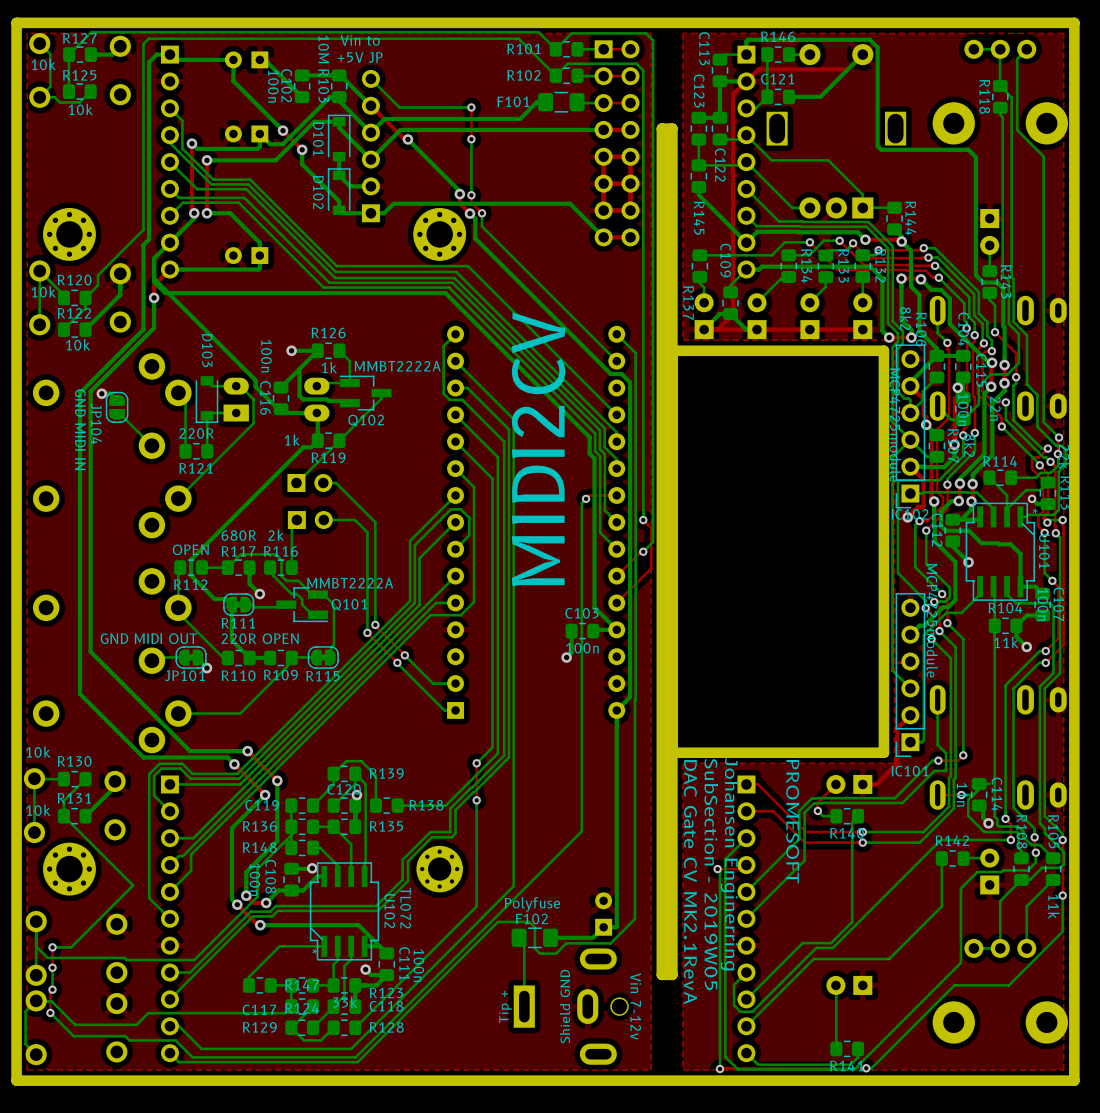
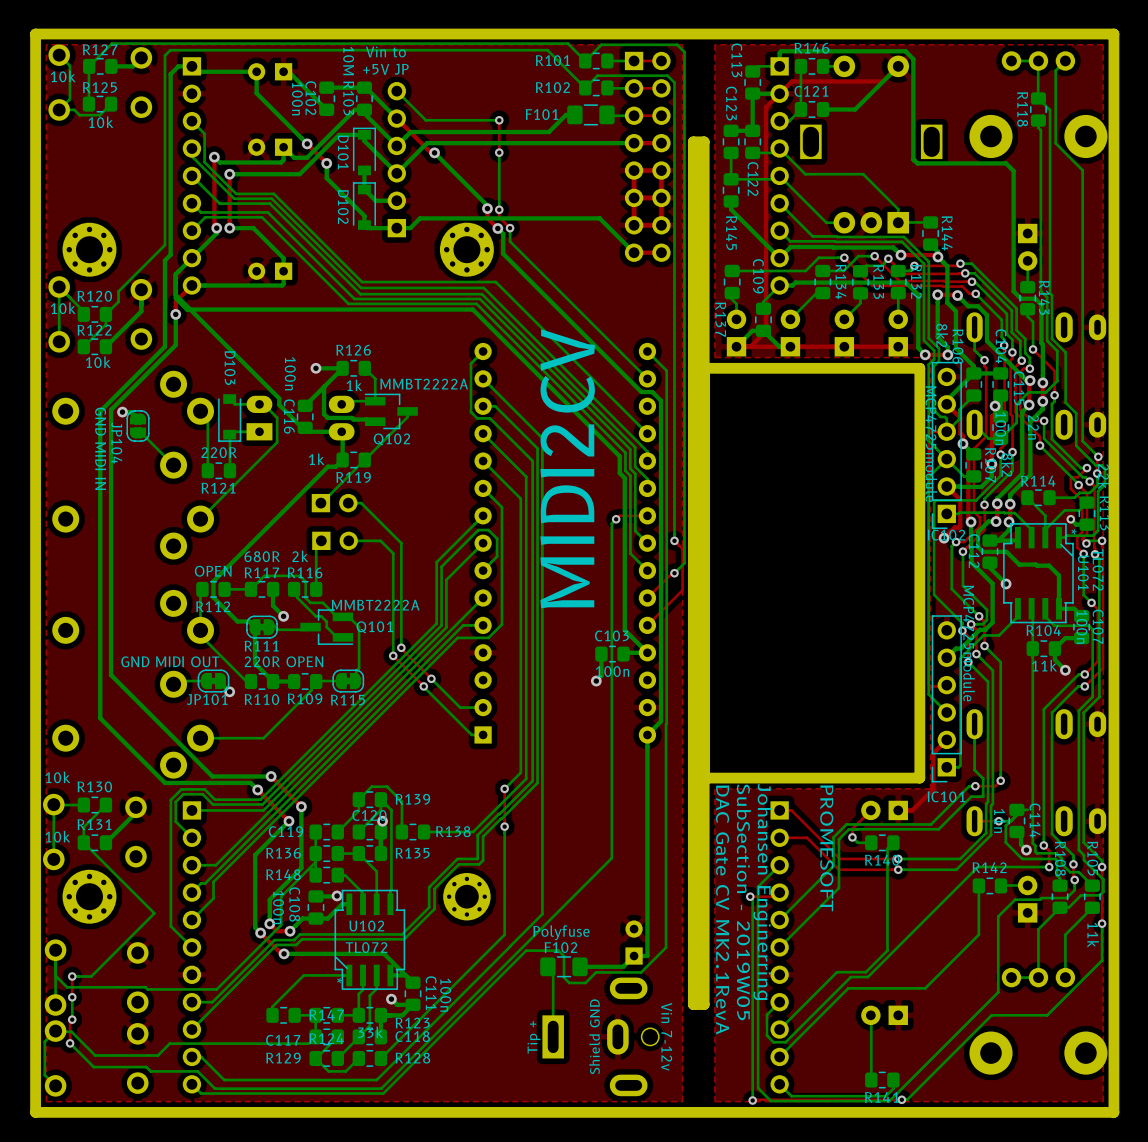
U101 value: none -> TL072 (1098, 569)
U102 value rotation: 0° (405, 908) -> 90° counterclockwise (366, 947)
U102 value position: TL072 (405, 908) -> TL072 (366, 947)
U102 name rotation: 0° (389, 911) -> 90° counterclockwise (366, 926)
U102 name position: U102 (389, 911) -> U102 (366, 926)

